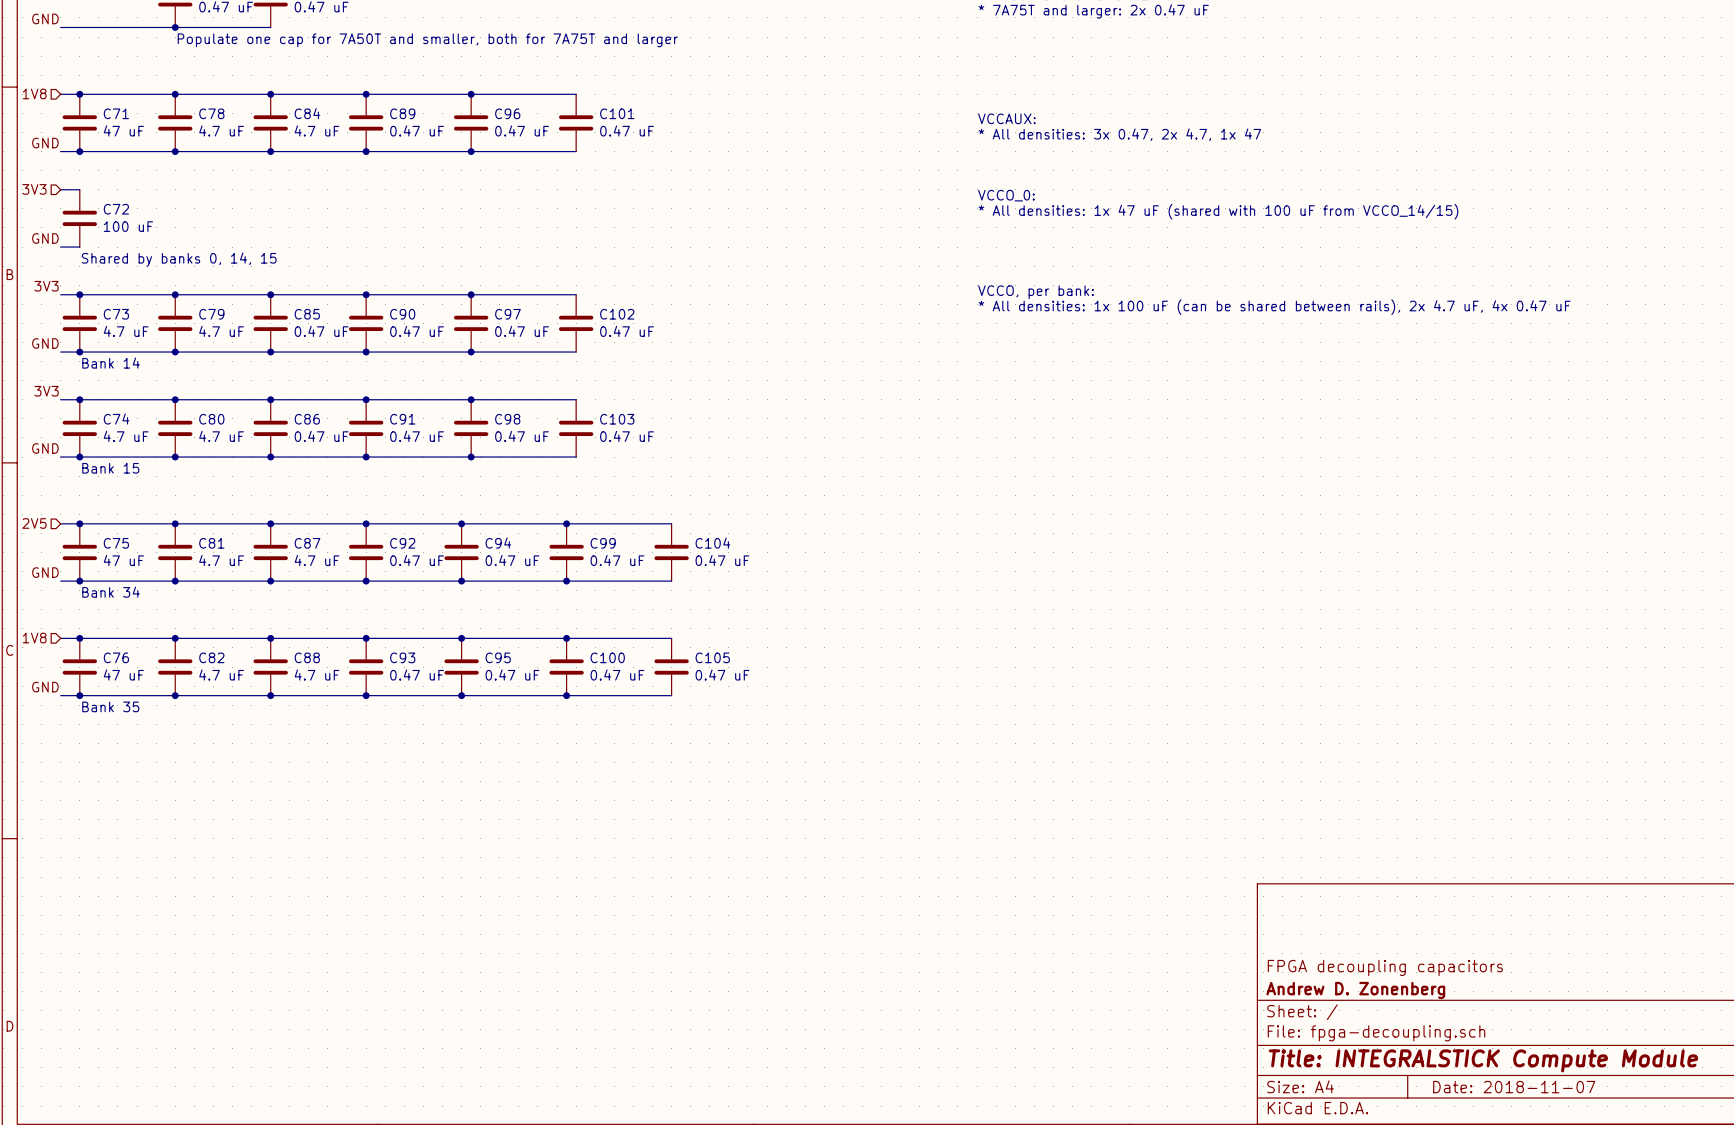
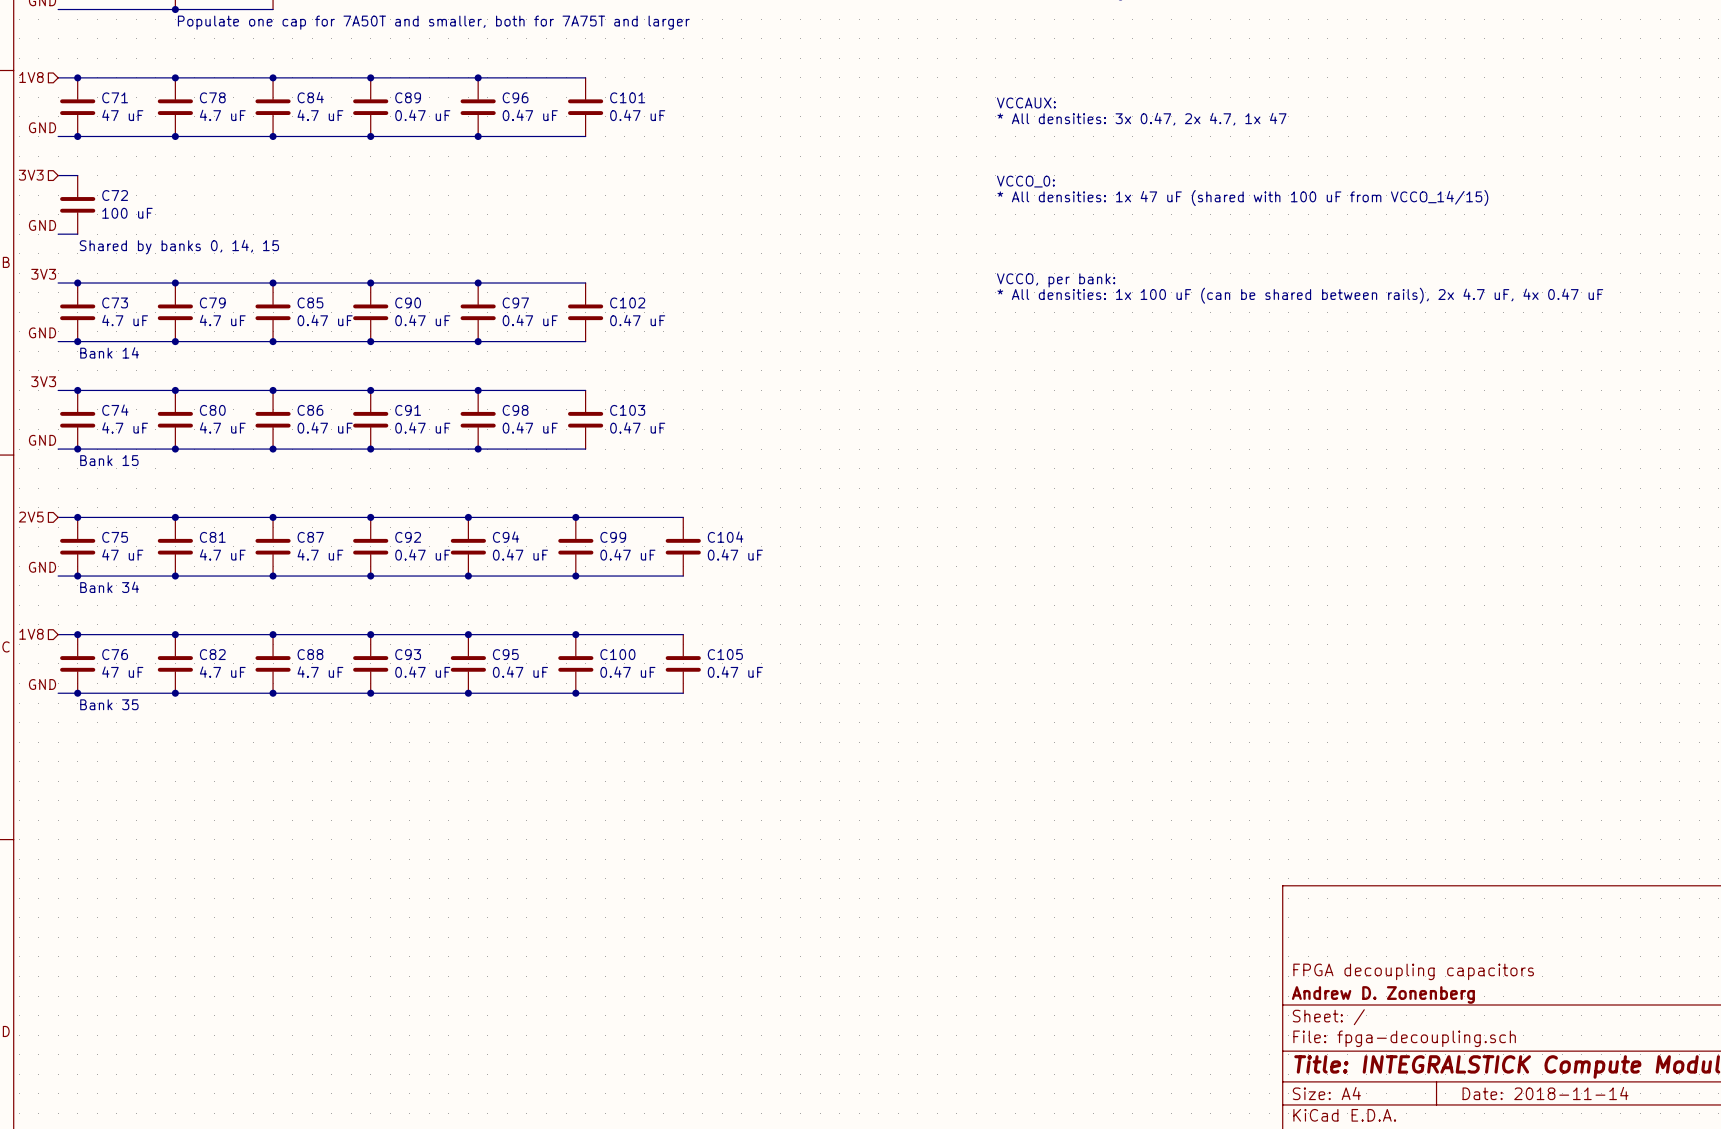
title block: Date: 2018-11-07 (1514, 1087) -> Date: 2018-11-14 (1545, 1093)

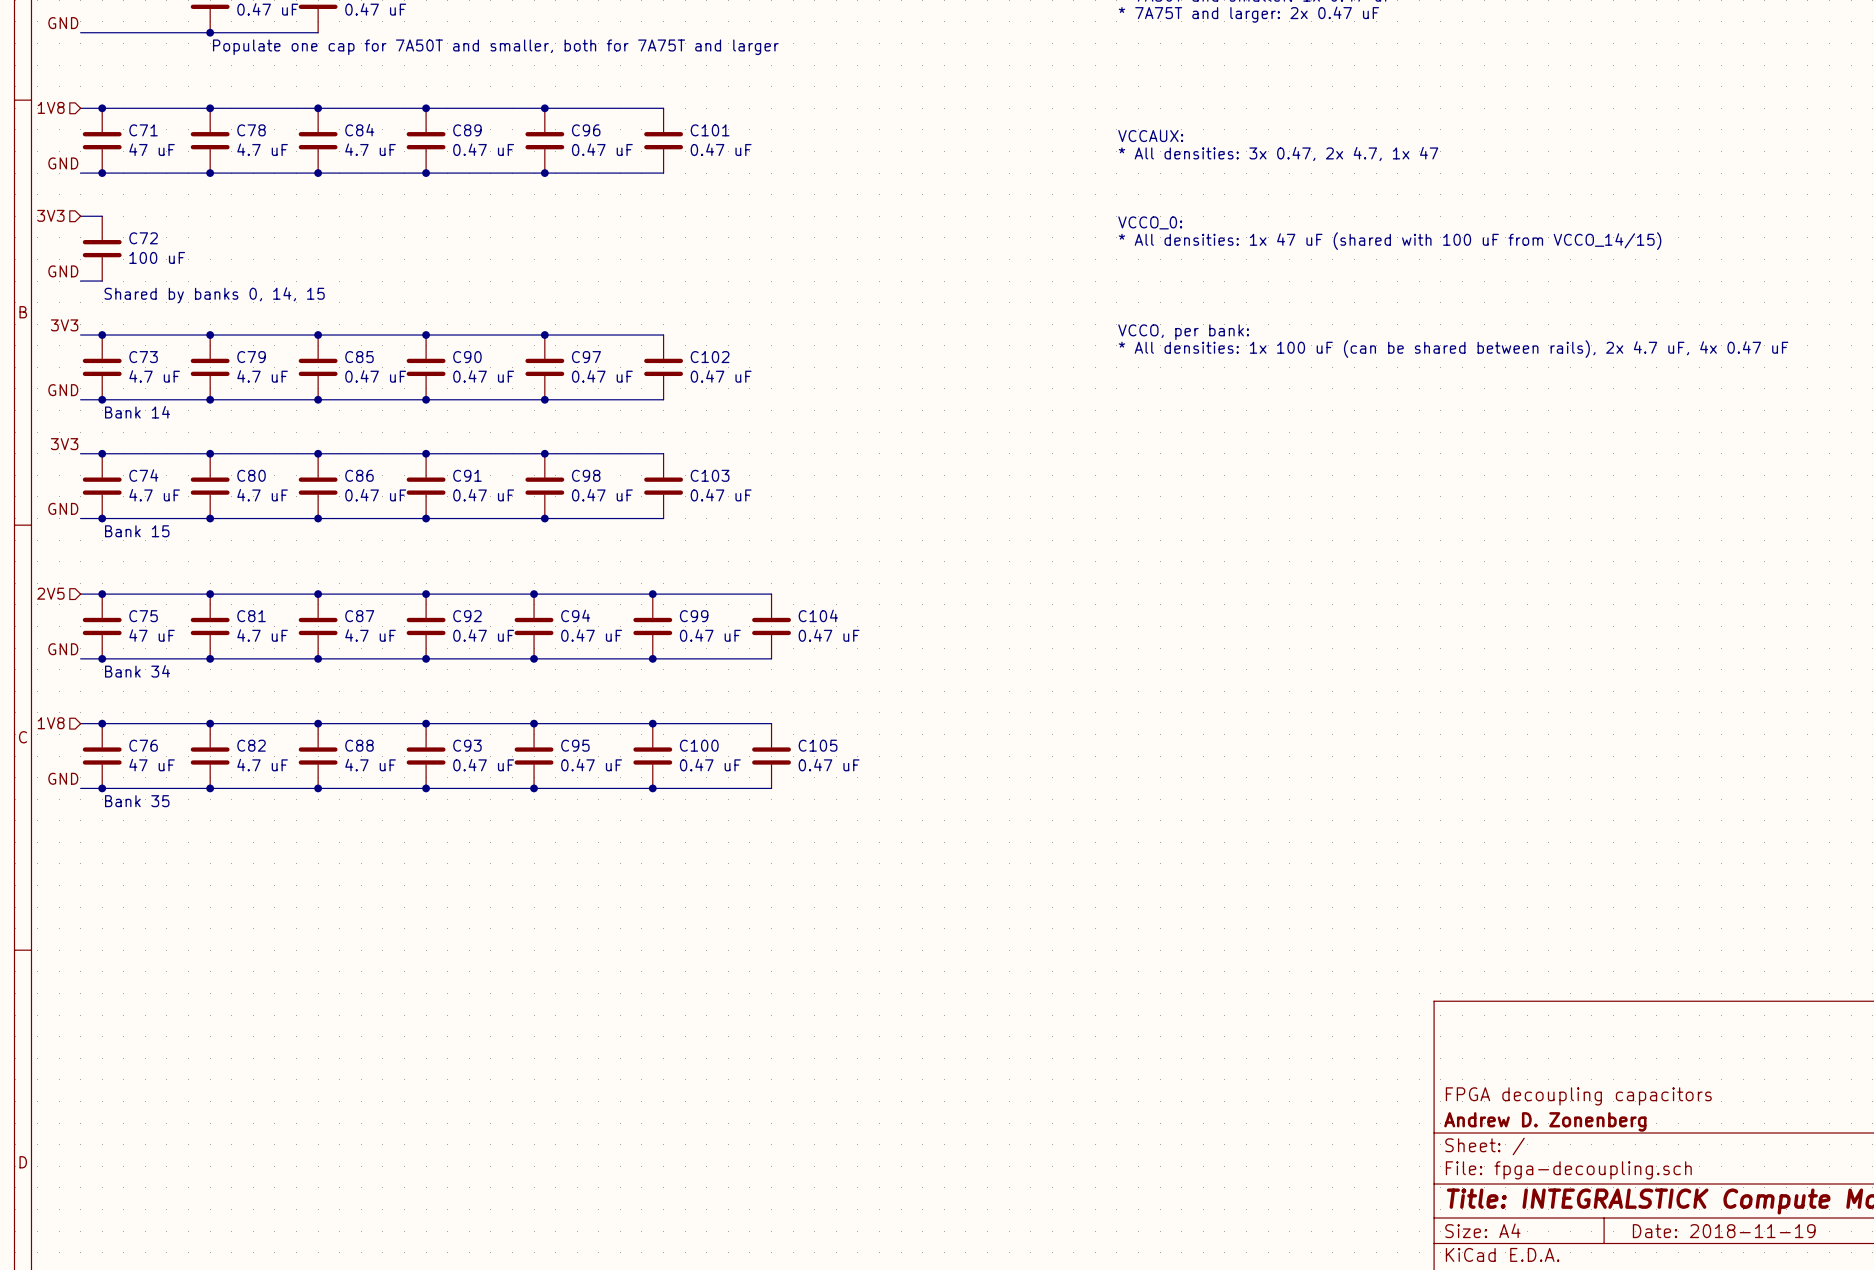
title block: Date: 2018-11-14 (1545, 1093) -> Date: 2018-11-19 (1724, 1231)

